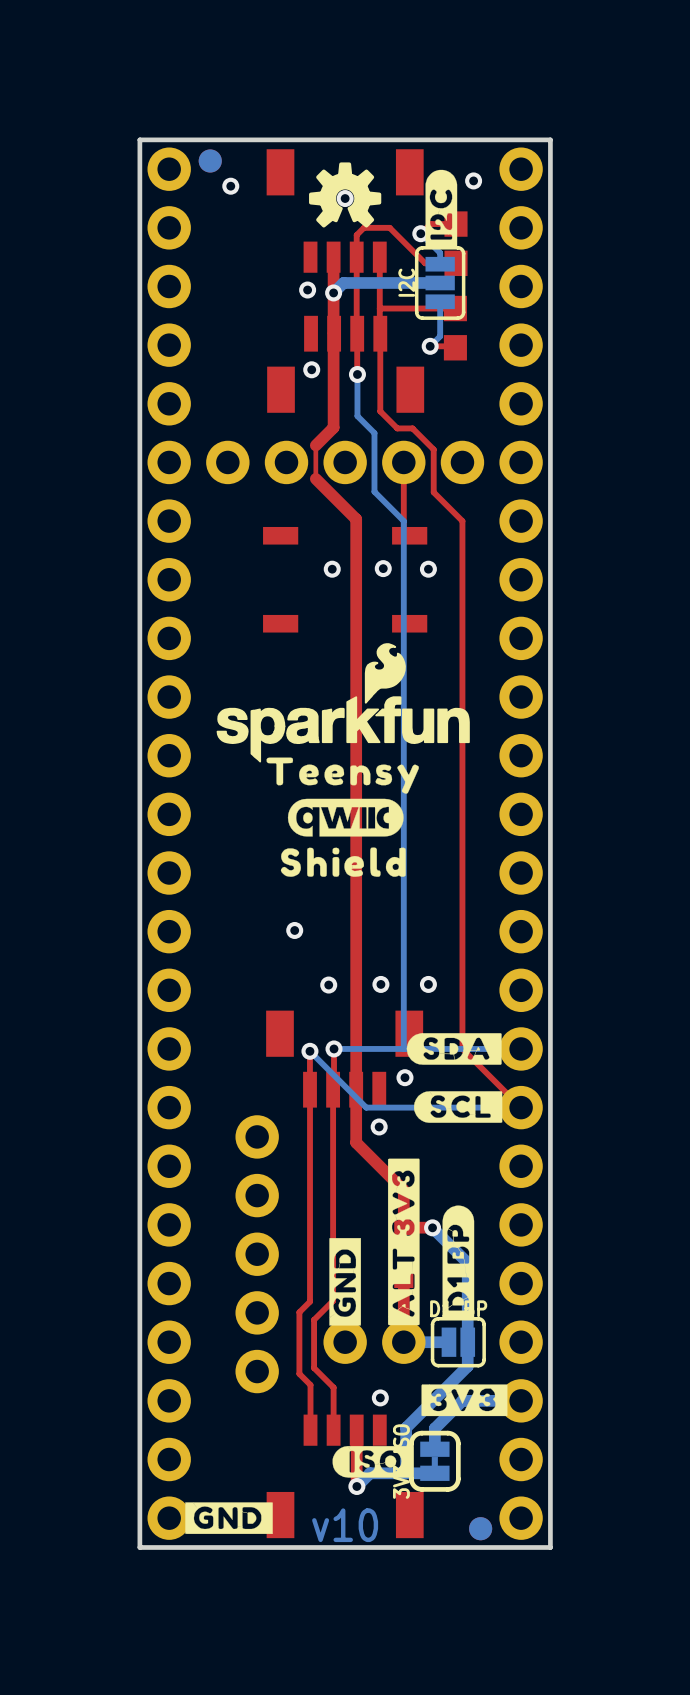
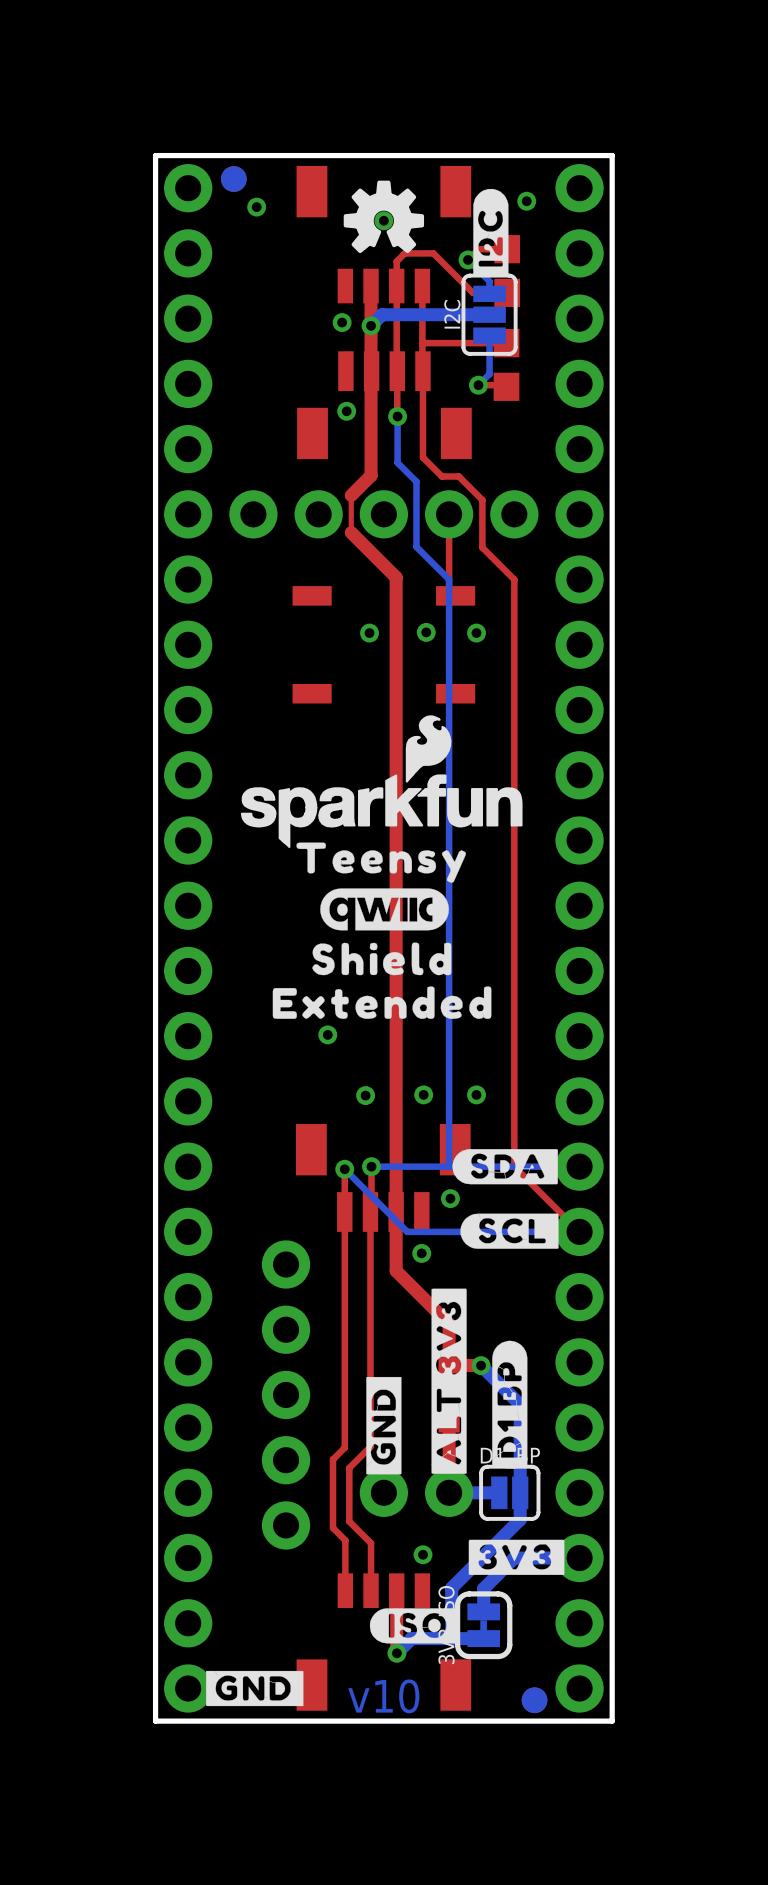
drawing: none -> [272, 986, 492, 1019]

